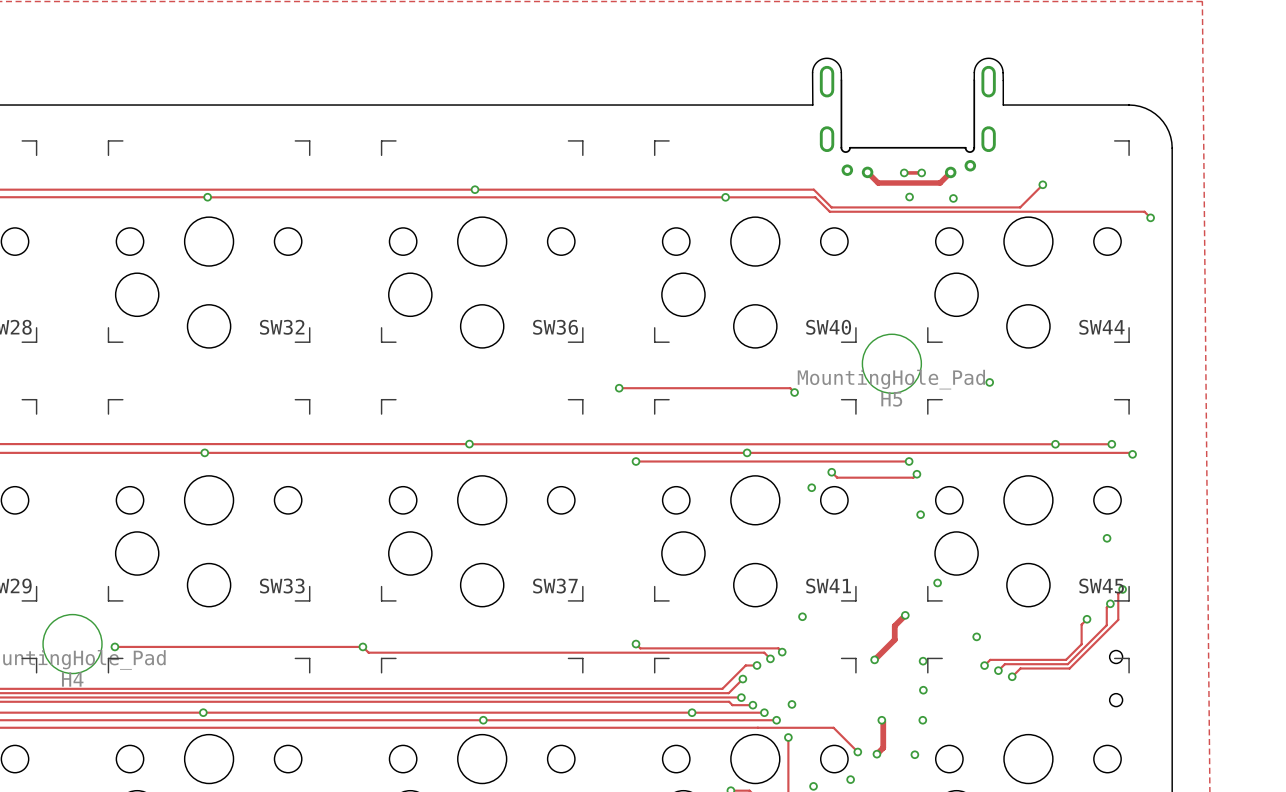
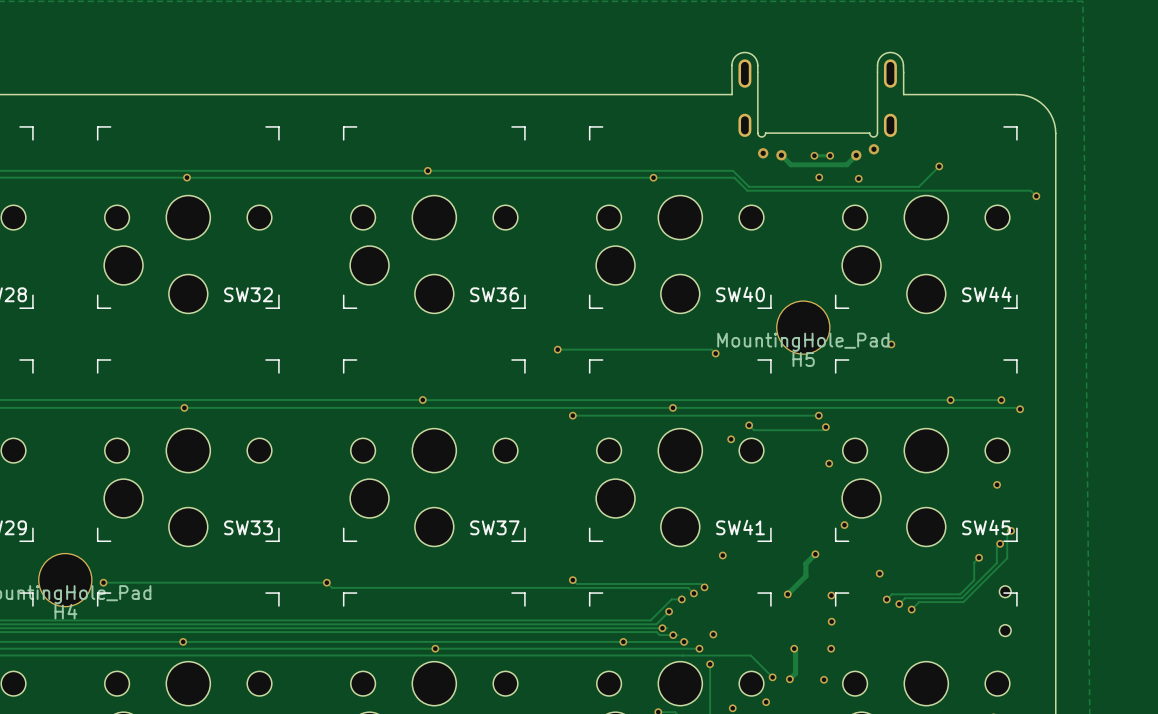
via: none -> (662, 628)
via: (741, 697) -> none
via: none -> (673, 635)
via: (752, 705) -> none
via: none -> (684, 641)
via: (764, 712) -> none

